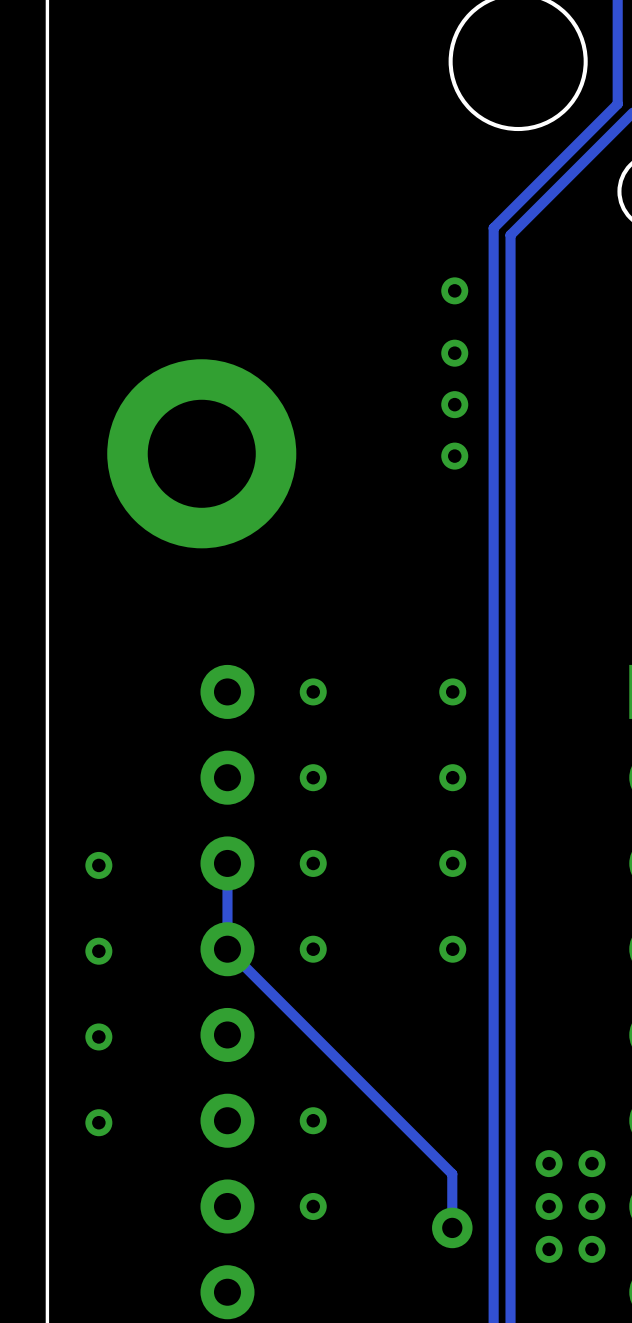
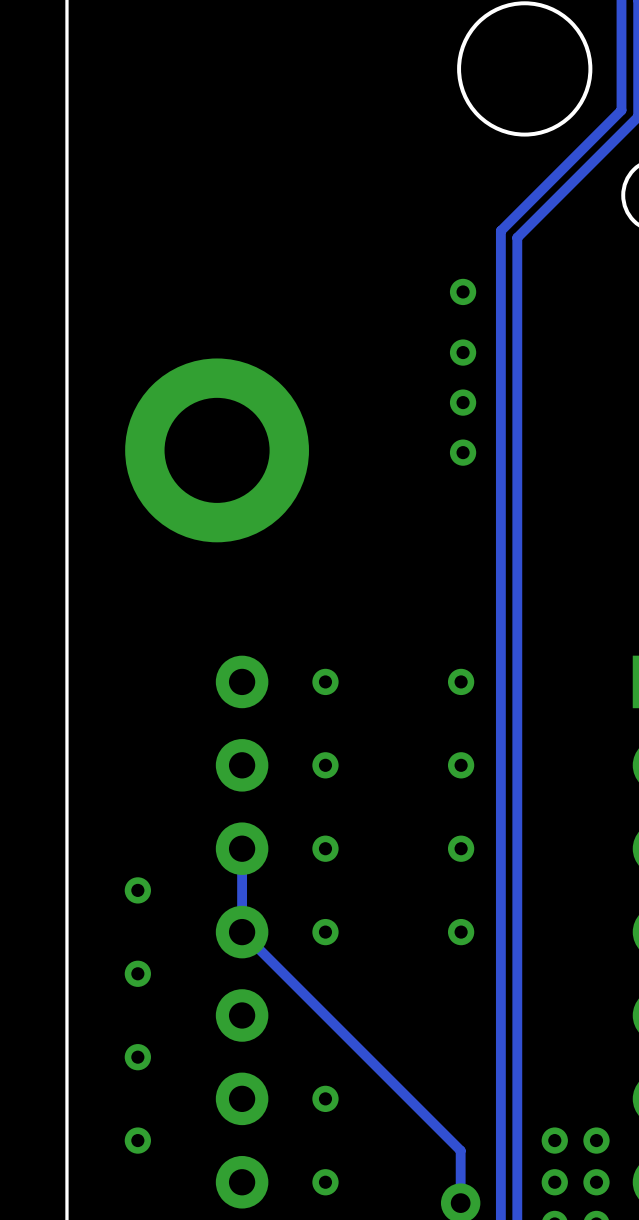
via: (98, 865) -> none
via: none -> (137, 890)
via: (98, 951) -> none
via: none -> (137, 973)
via: (98, 1036) -> none
via: none -> (137, 1057)
via: (98, 1122) -> none
via: none -> (137, 1140)

